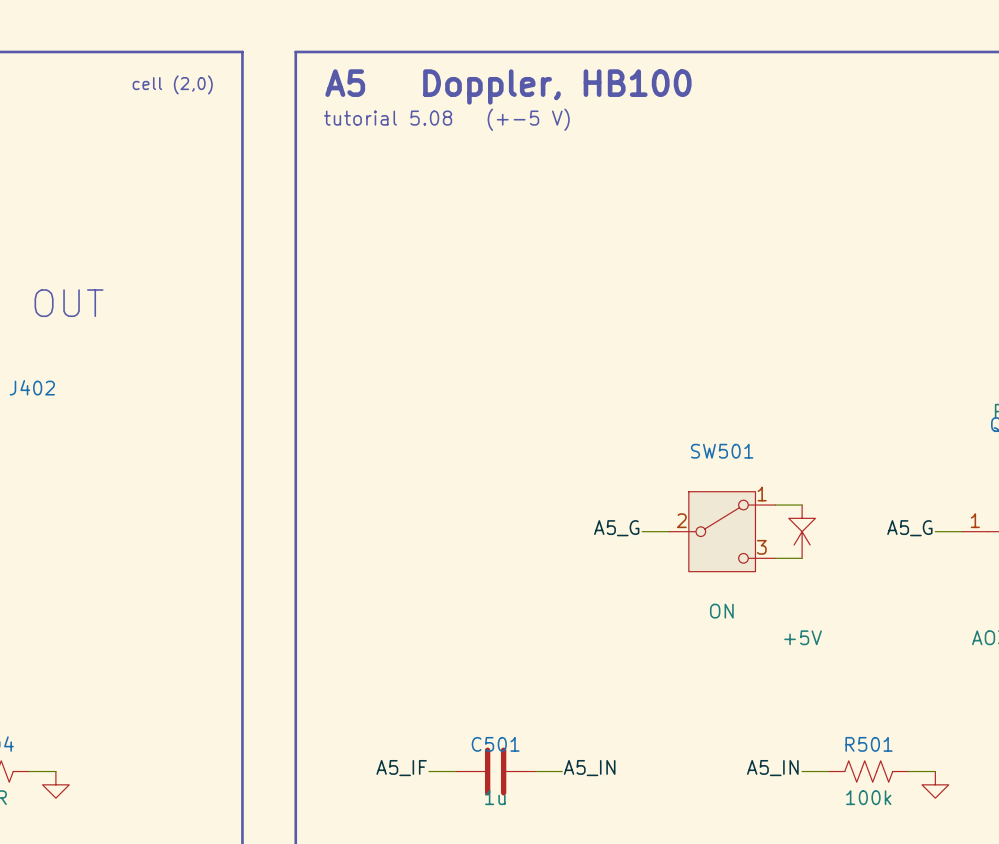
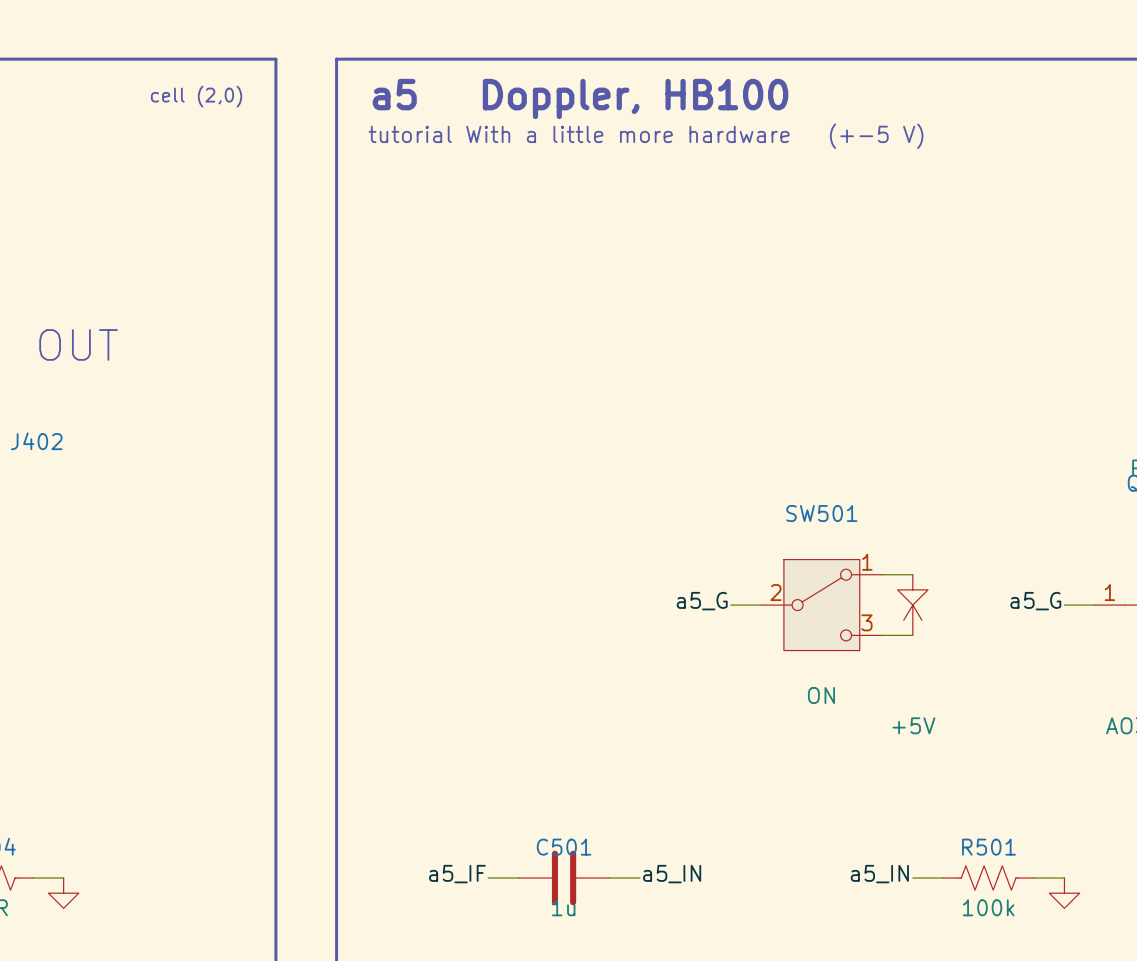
text: A5 Doppler, HB100 (508, 86) -> a5 Doppler, HB100 (580, 98)
text: tutorial 5.08 (+-5 V) (446, 119) -> tutorial With a little more hardware (+-5 V) (646, 136)
label: A5_G (616, 528) -> a5_G (702, 601)
label: A5_G (909, 528) -> a5_G (1035, 601)
label: A5_IF (401, 768) -> a5_IF (457, 874)
label: A5_IN (589, 768) -> a5_IN (672, 874)
label: A5_IN (772, 768) -> a5_IN (879, 874)

